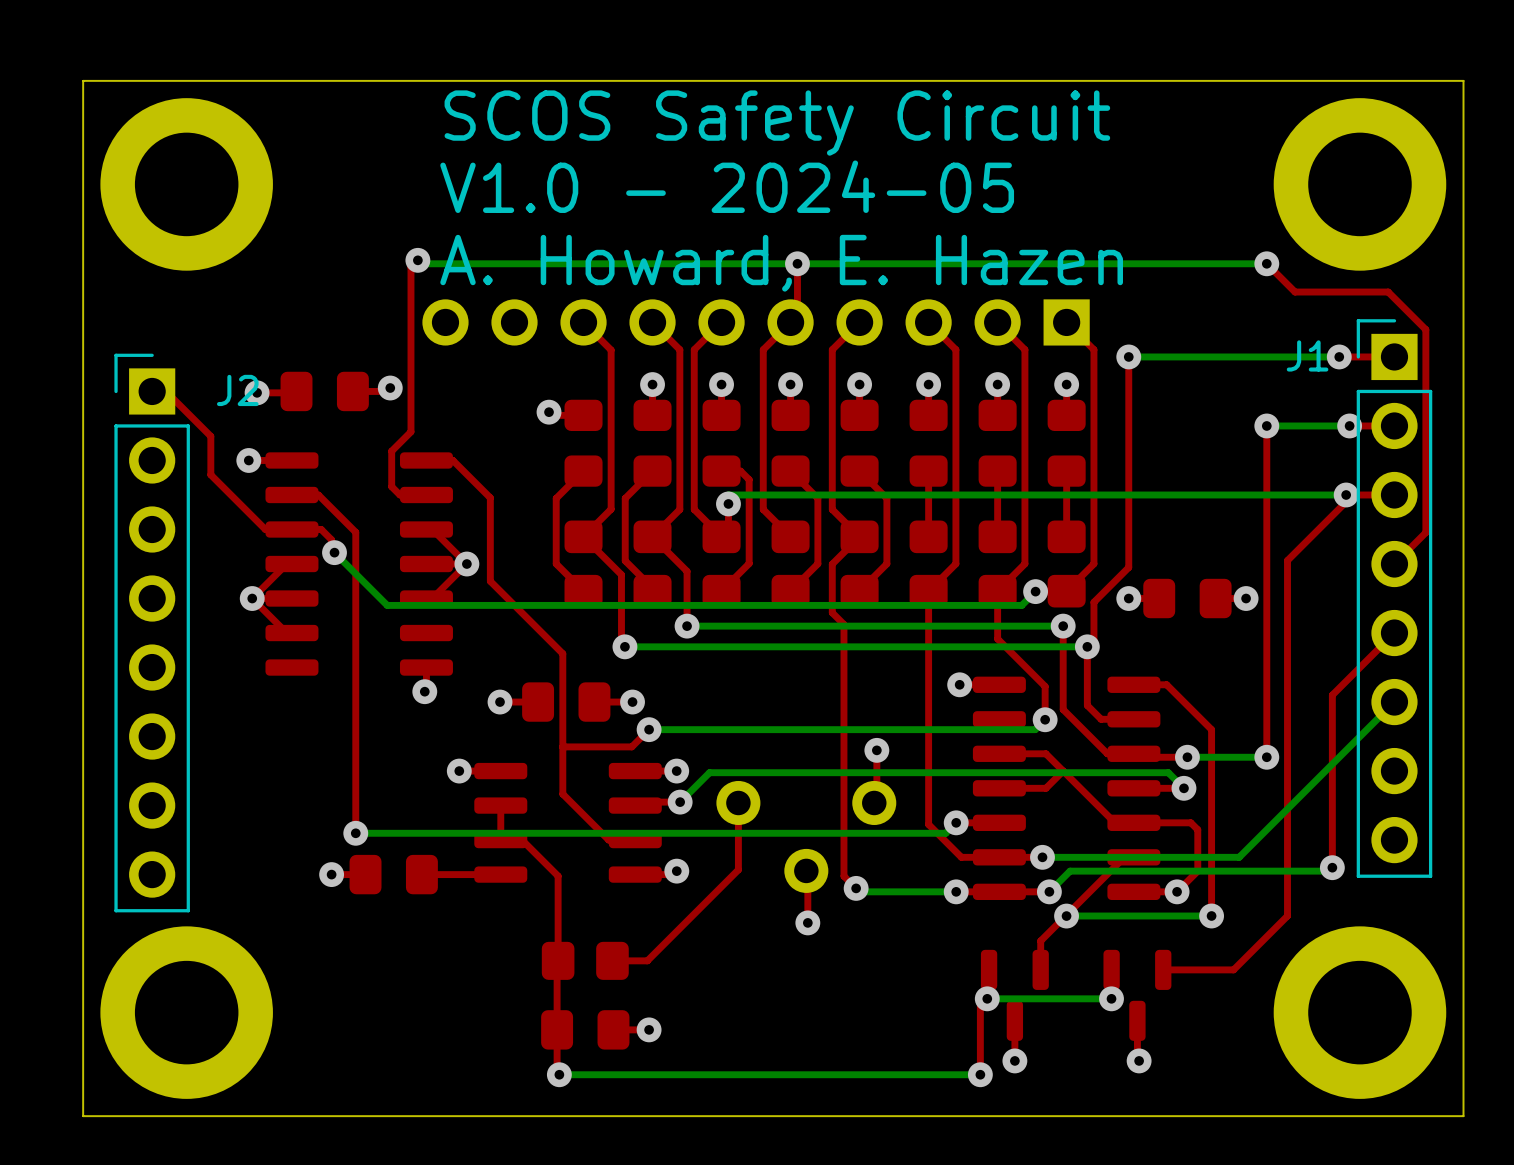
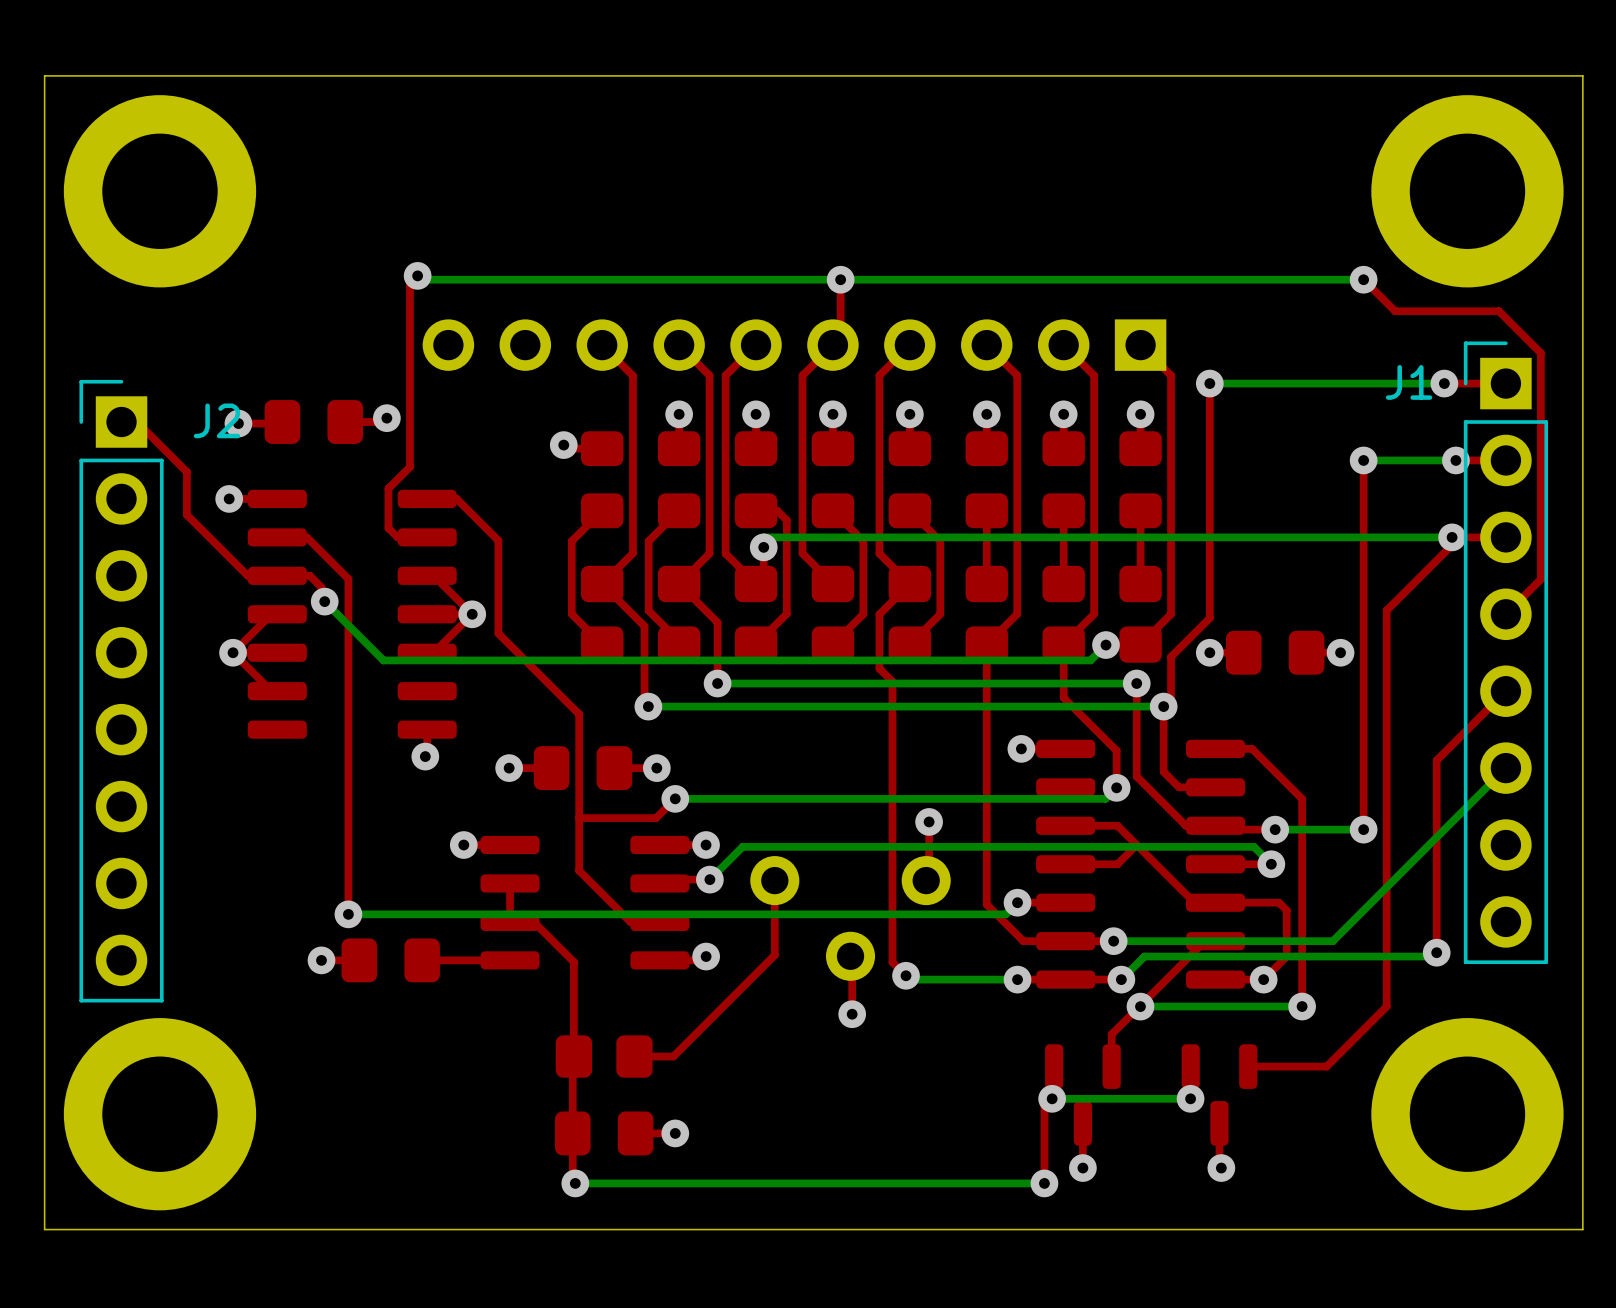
text: SCOS Safety Circuit (777, 123) -> none
text: V1.0 - 2024-05 (727, 186) -> none
text: A. Howard, E. Hazen (781, 263) -> none

